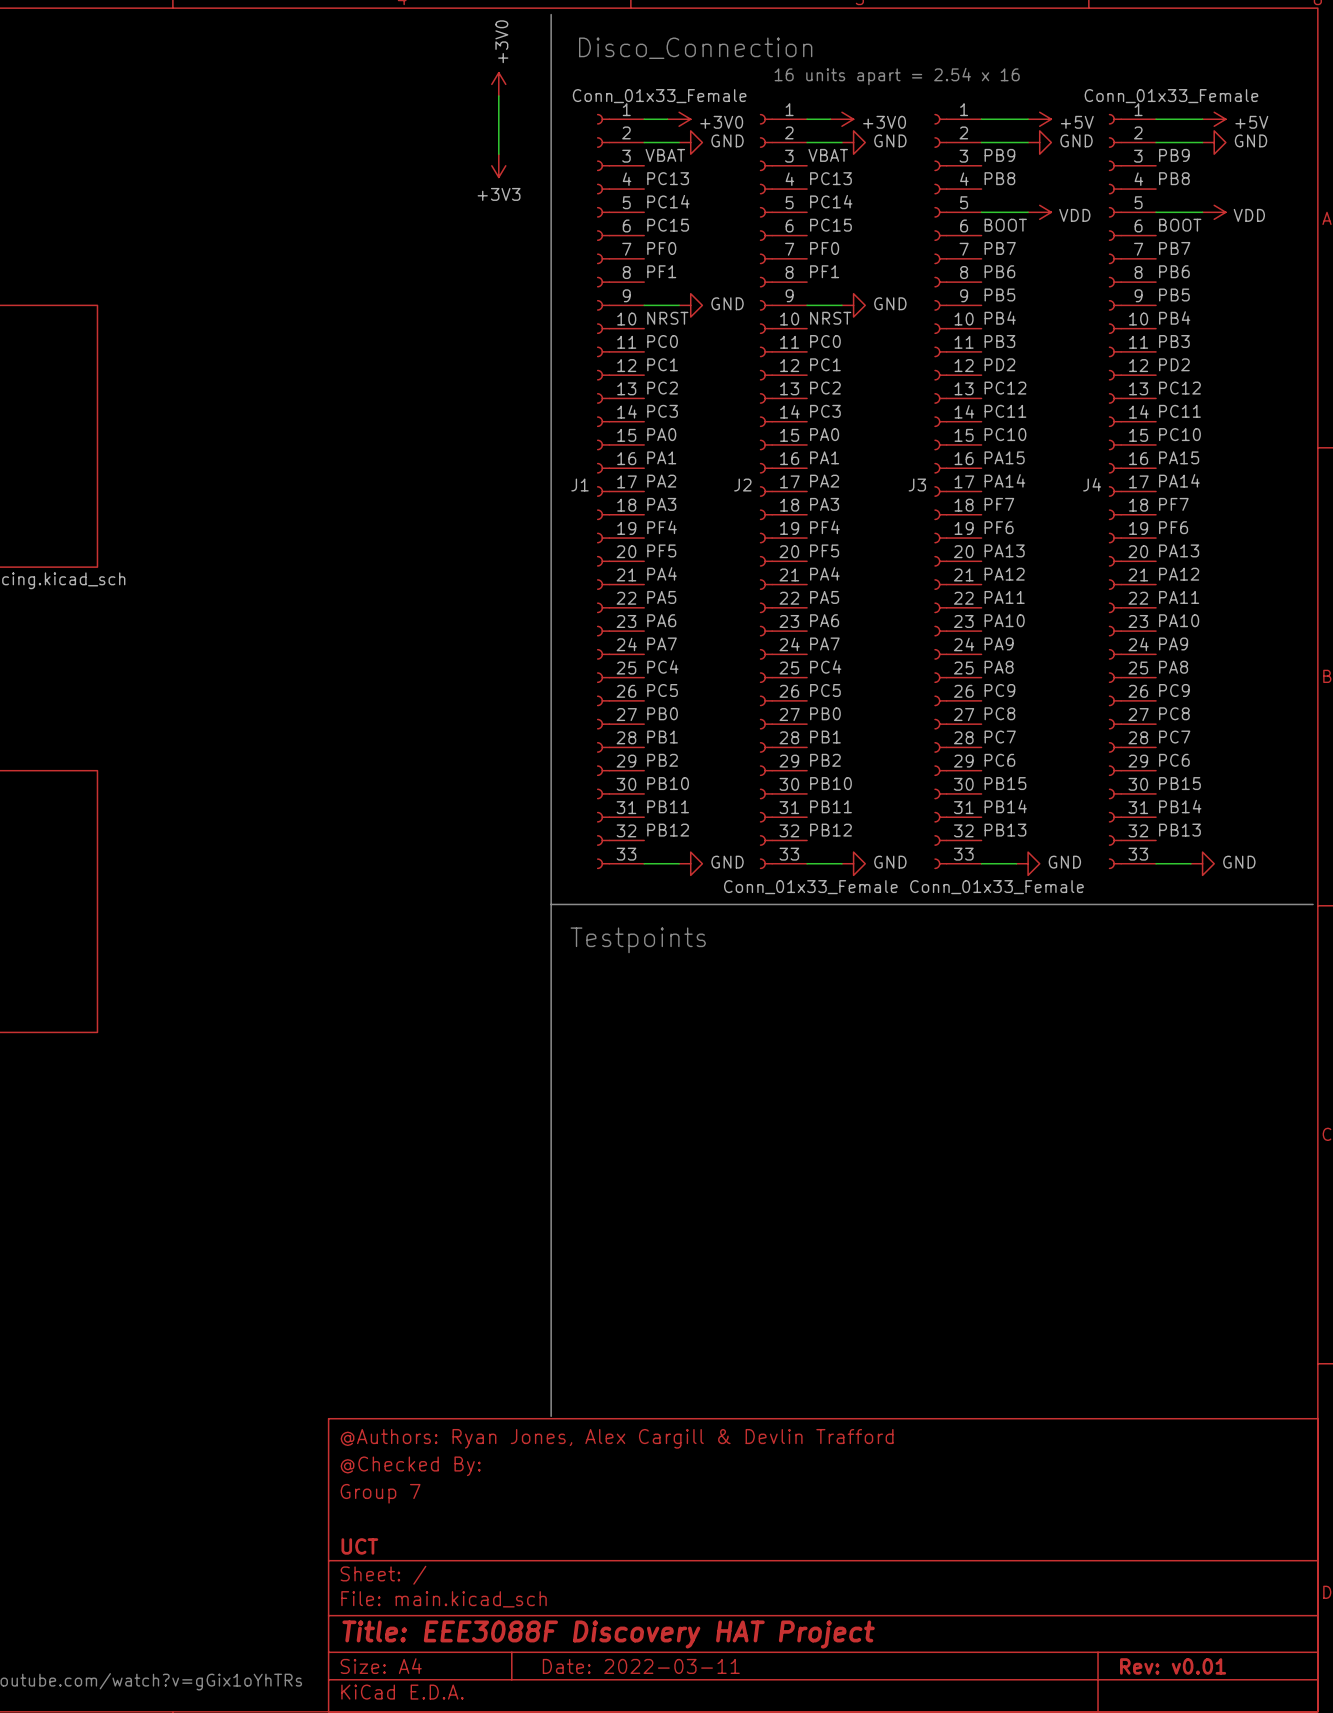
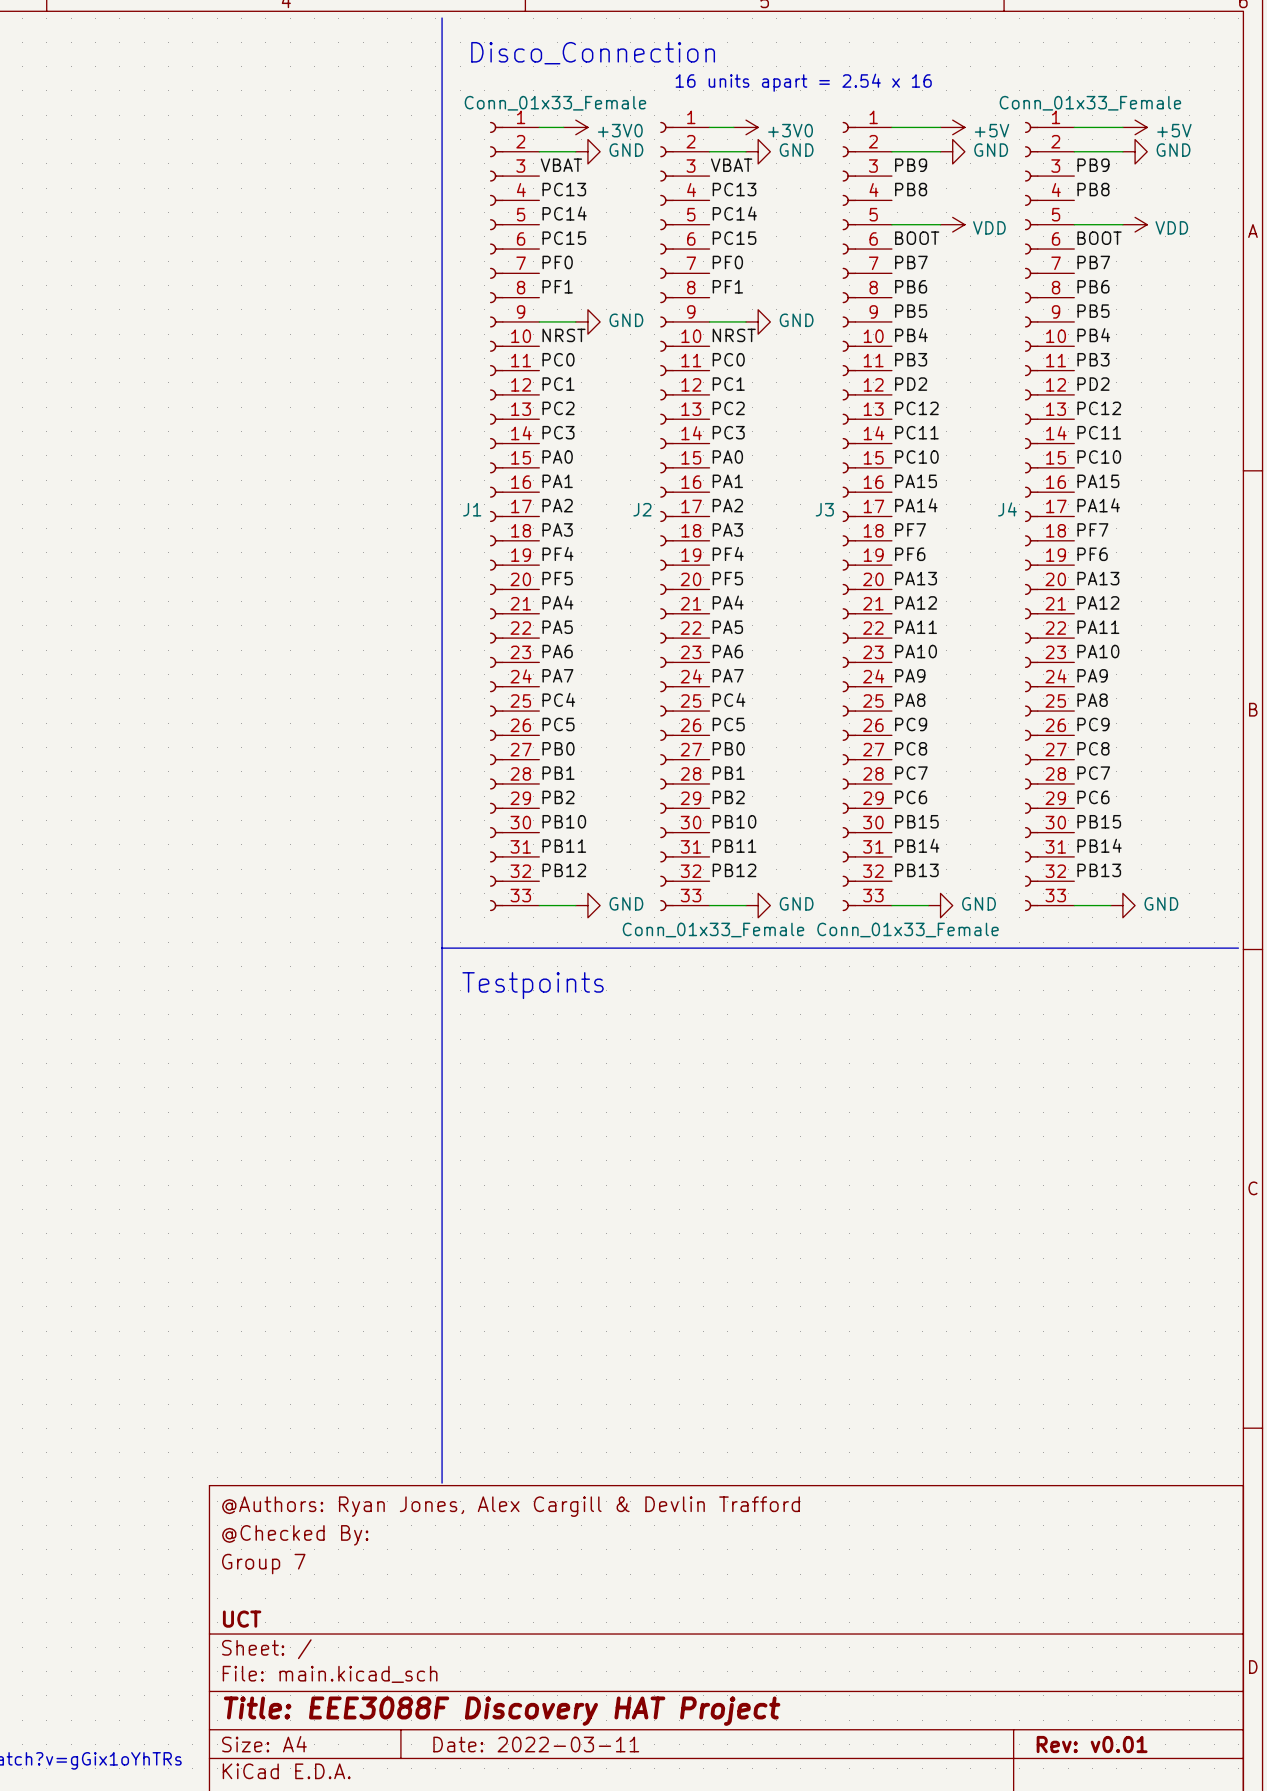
power symbol: +3V0 (498, 84) -> none
wire: (498, 95) (498, 154) -> none
power symbol: +3V3 (498, 165) -> none

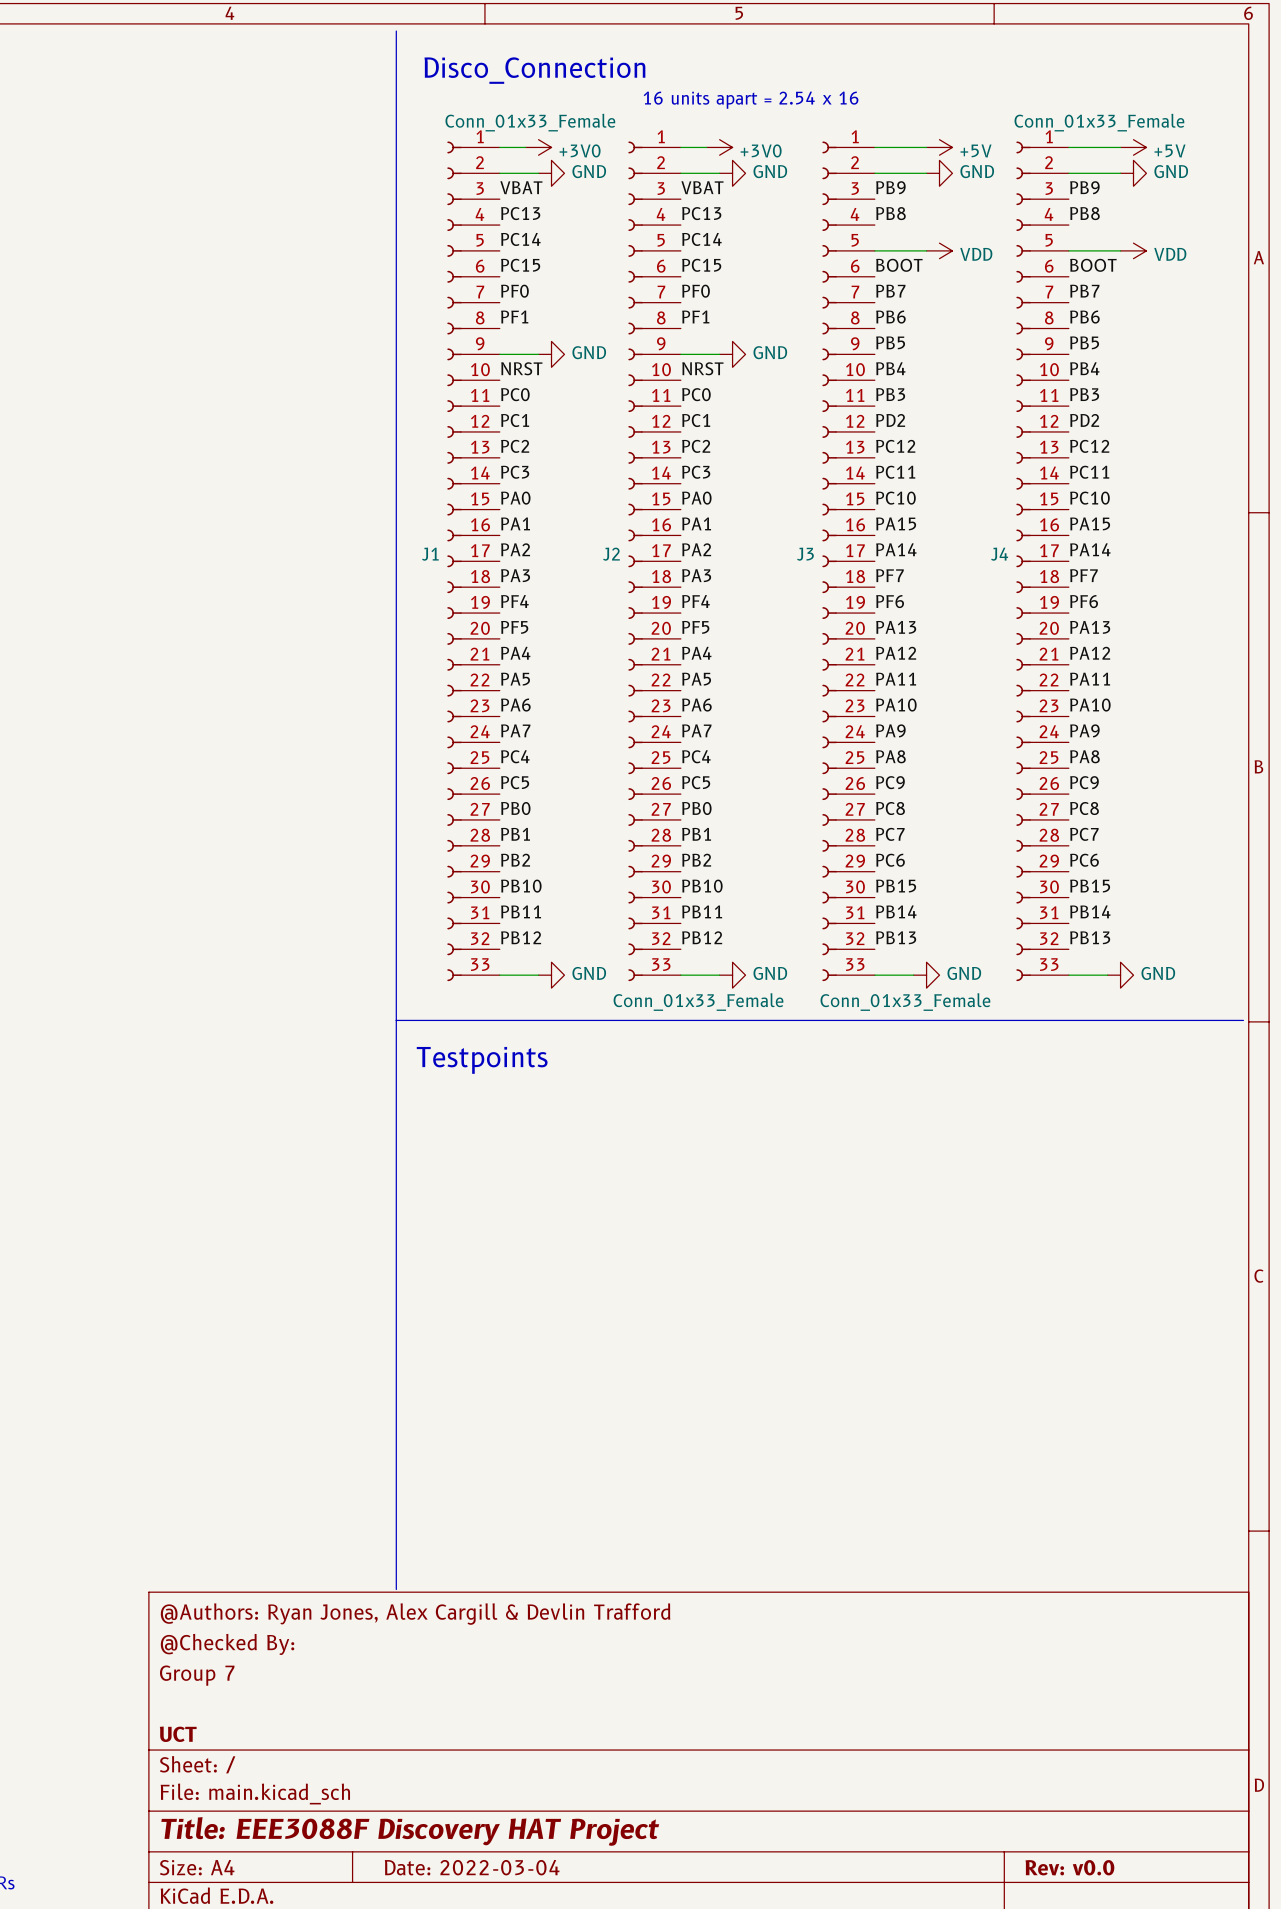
title block: Date: 2022-03-11 (536, 1744) -> Date: 2022-03-04 (472, 1867)
title block: Rev: v0.01 (1092, 1744) -> Rev: v0.0 (1069, 1867)

